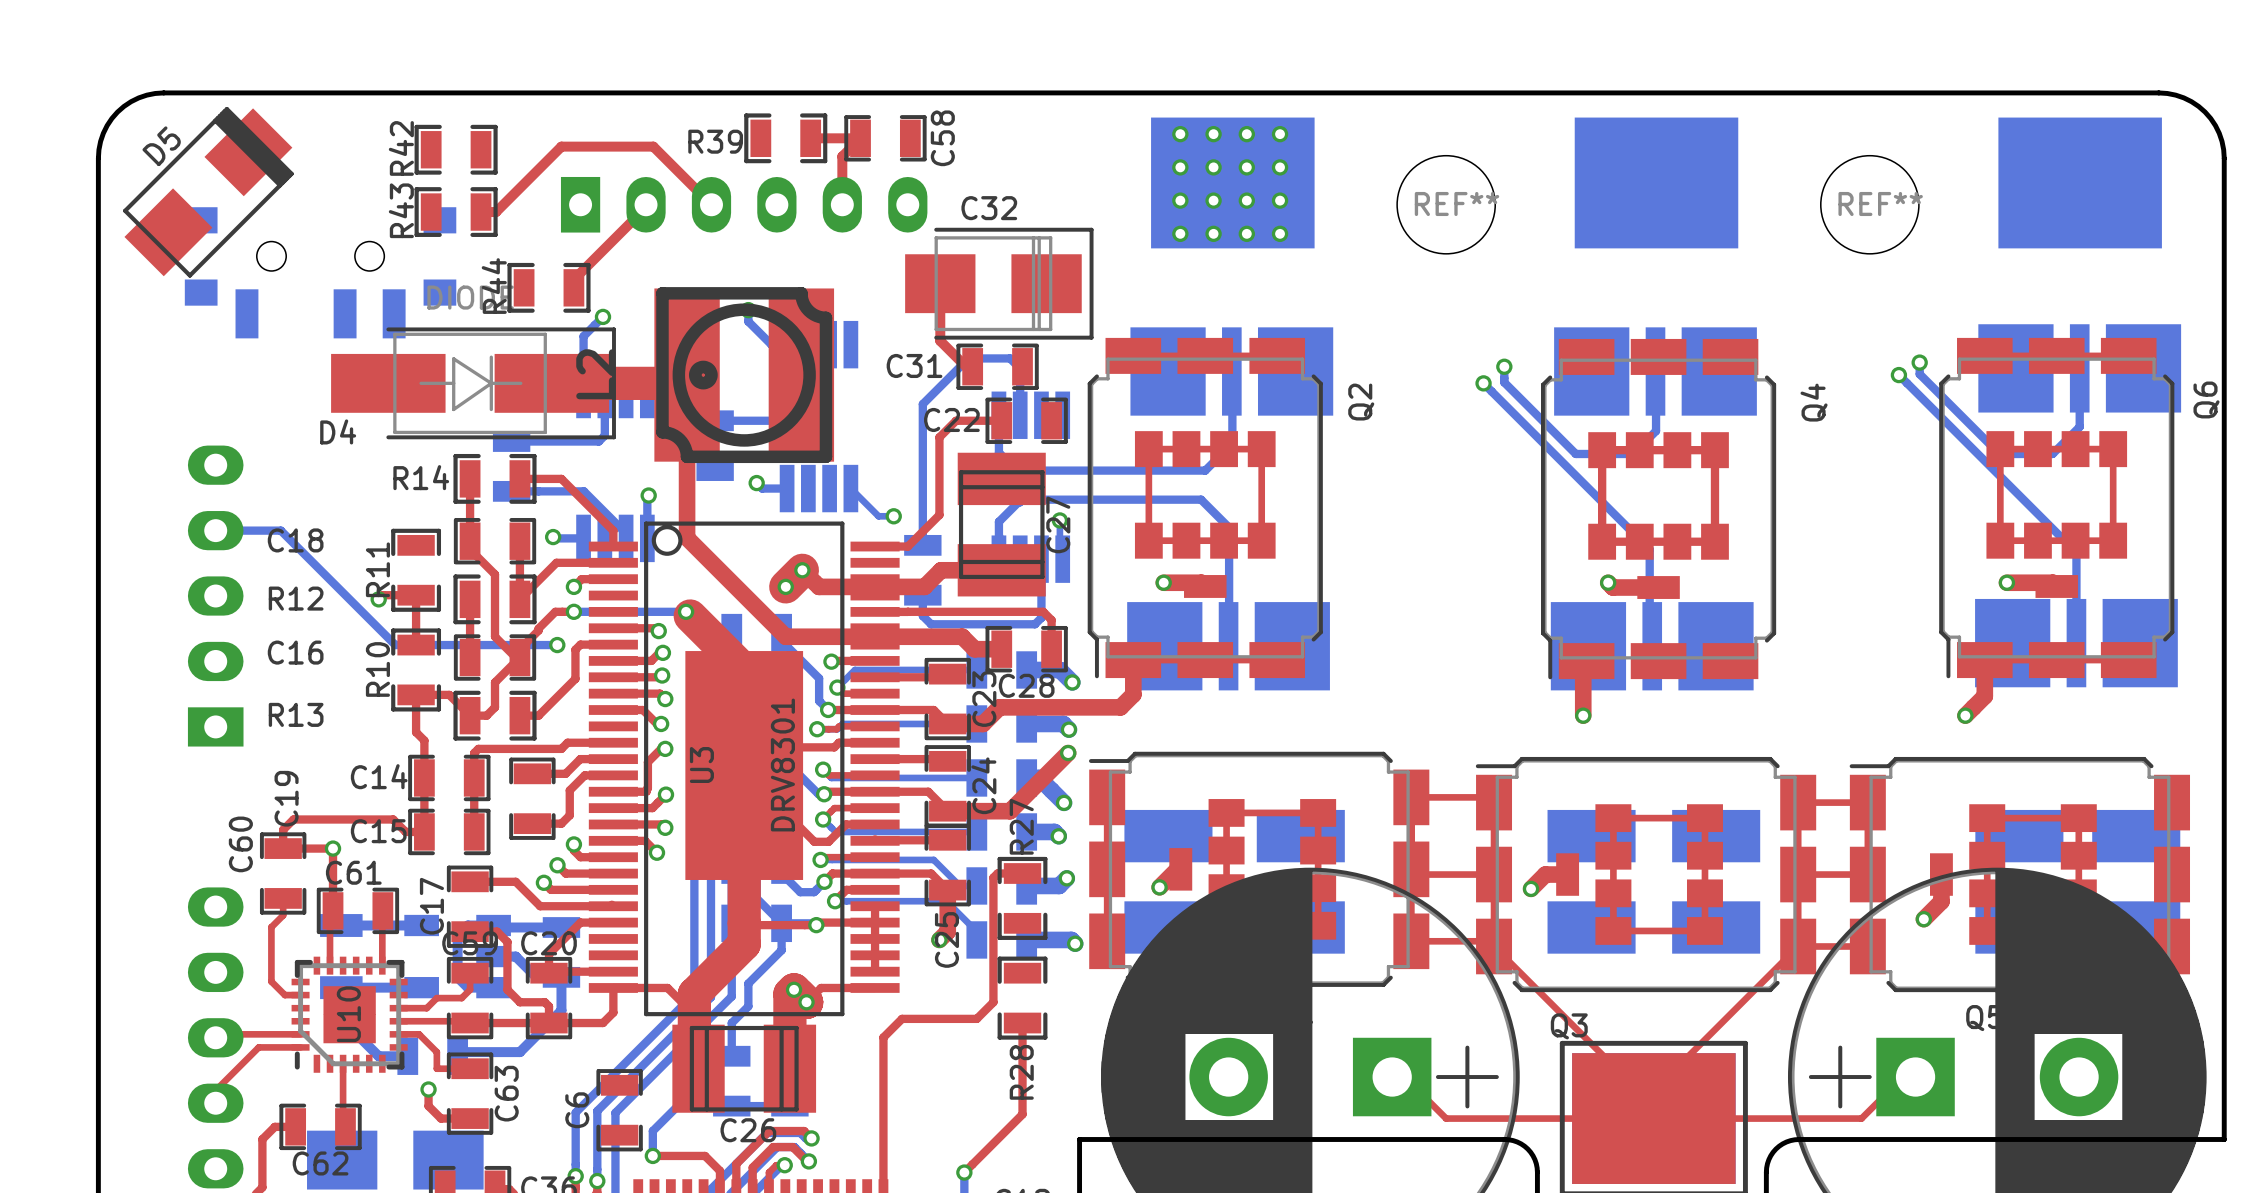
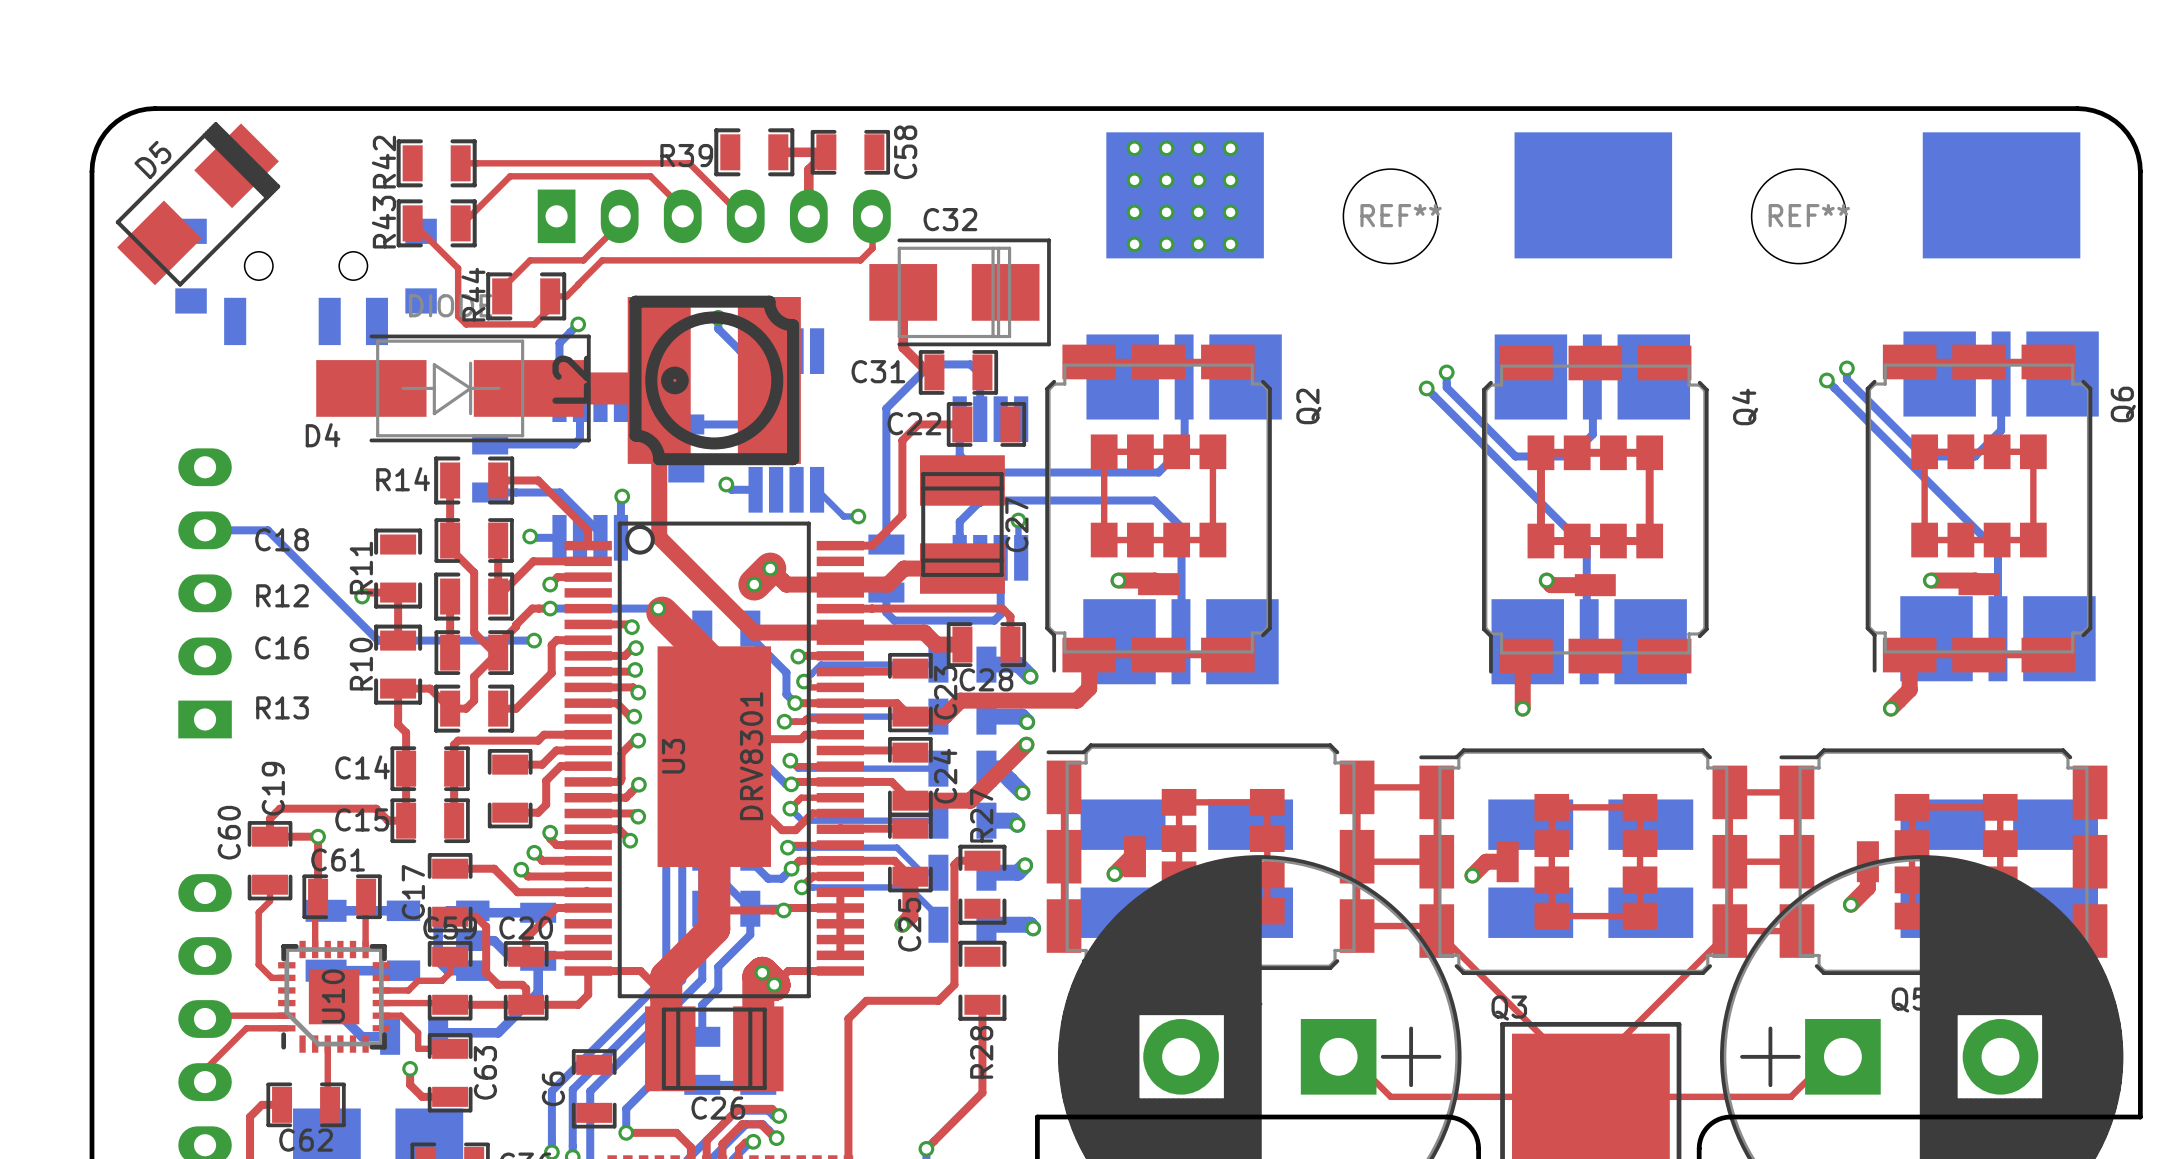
top track: none -> (460, 163) (689, 163) (742, 216) (745, 216)
top track: none -> (619, 216) (619, 224) (583, 260) (530, 260) (502, 288) (502, 296)
top track: (711, 204) (653, 146) (561, 146) (496, 212) (483, 212) -> (682, 216) (682, 208) (650, 176) (510, 176) (463, 223)
top track: none -> (871, 216) (872, 248) (860, 260) (602, 260) (578, 284)
top track: (646, 207) (573, 279) (573, 287) -> none
top track: none -> (413, 223) (458, 268) (458, 316) (466, 324) (534, 324) (550, 308) (550, 296) (566, 296) (578, 284)

